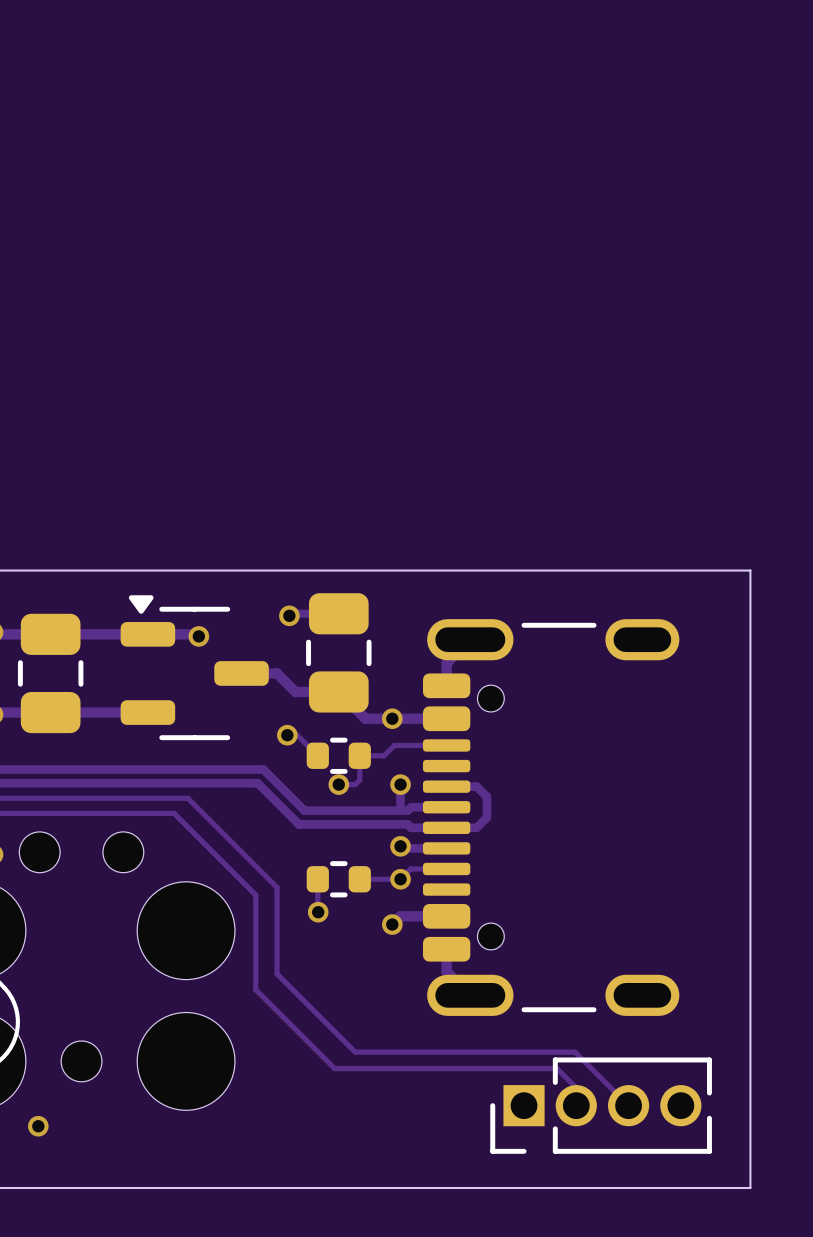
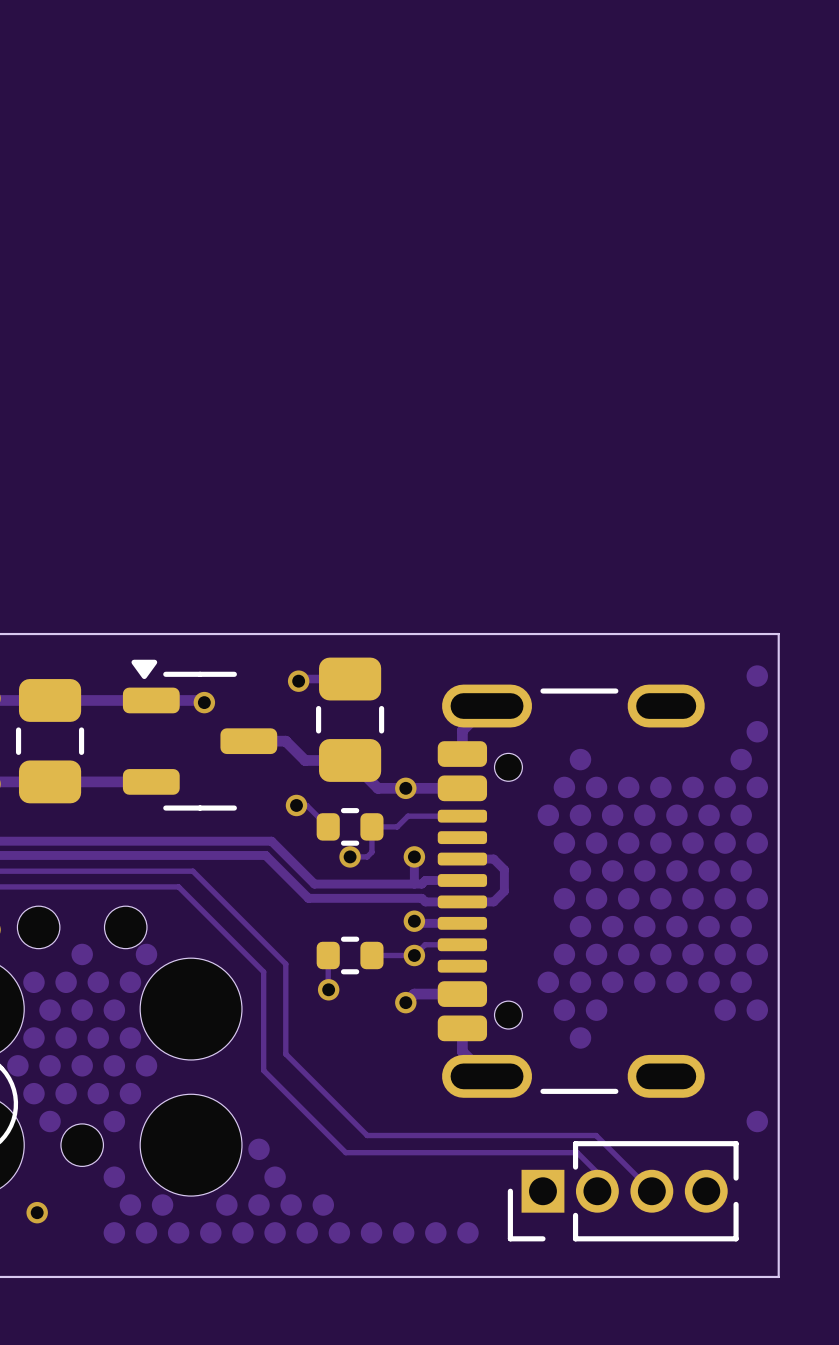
drawing: none -> [537, 665, 769, 1049]
drawing: none -> [7, 943, 479, 1244]
drawing: none -> [746, 1110, 769, 1133]

